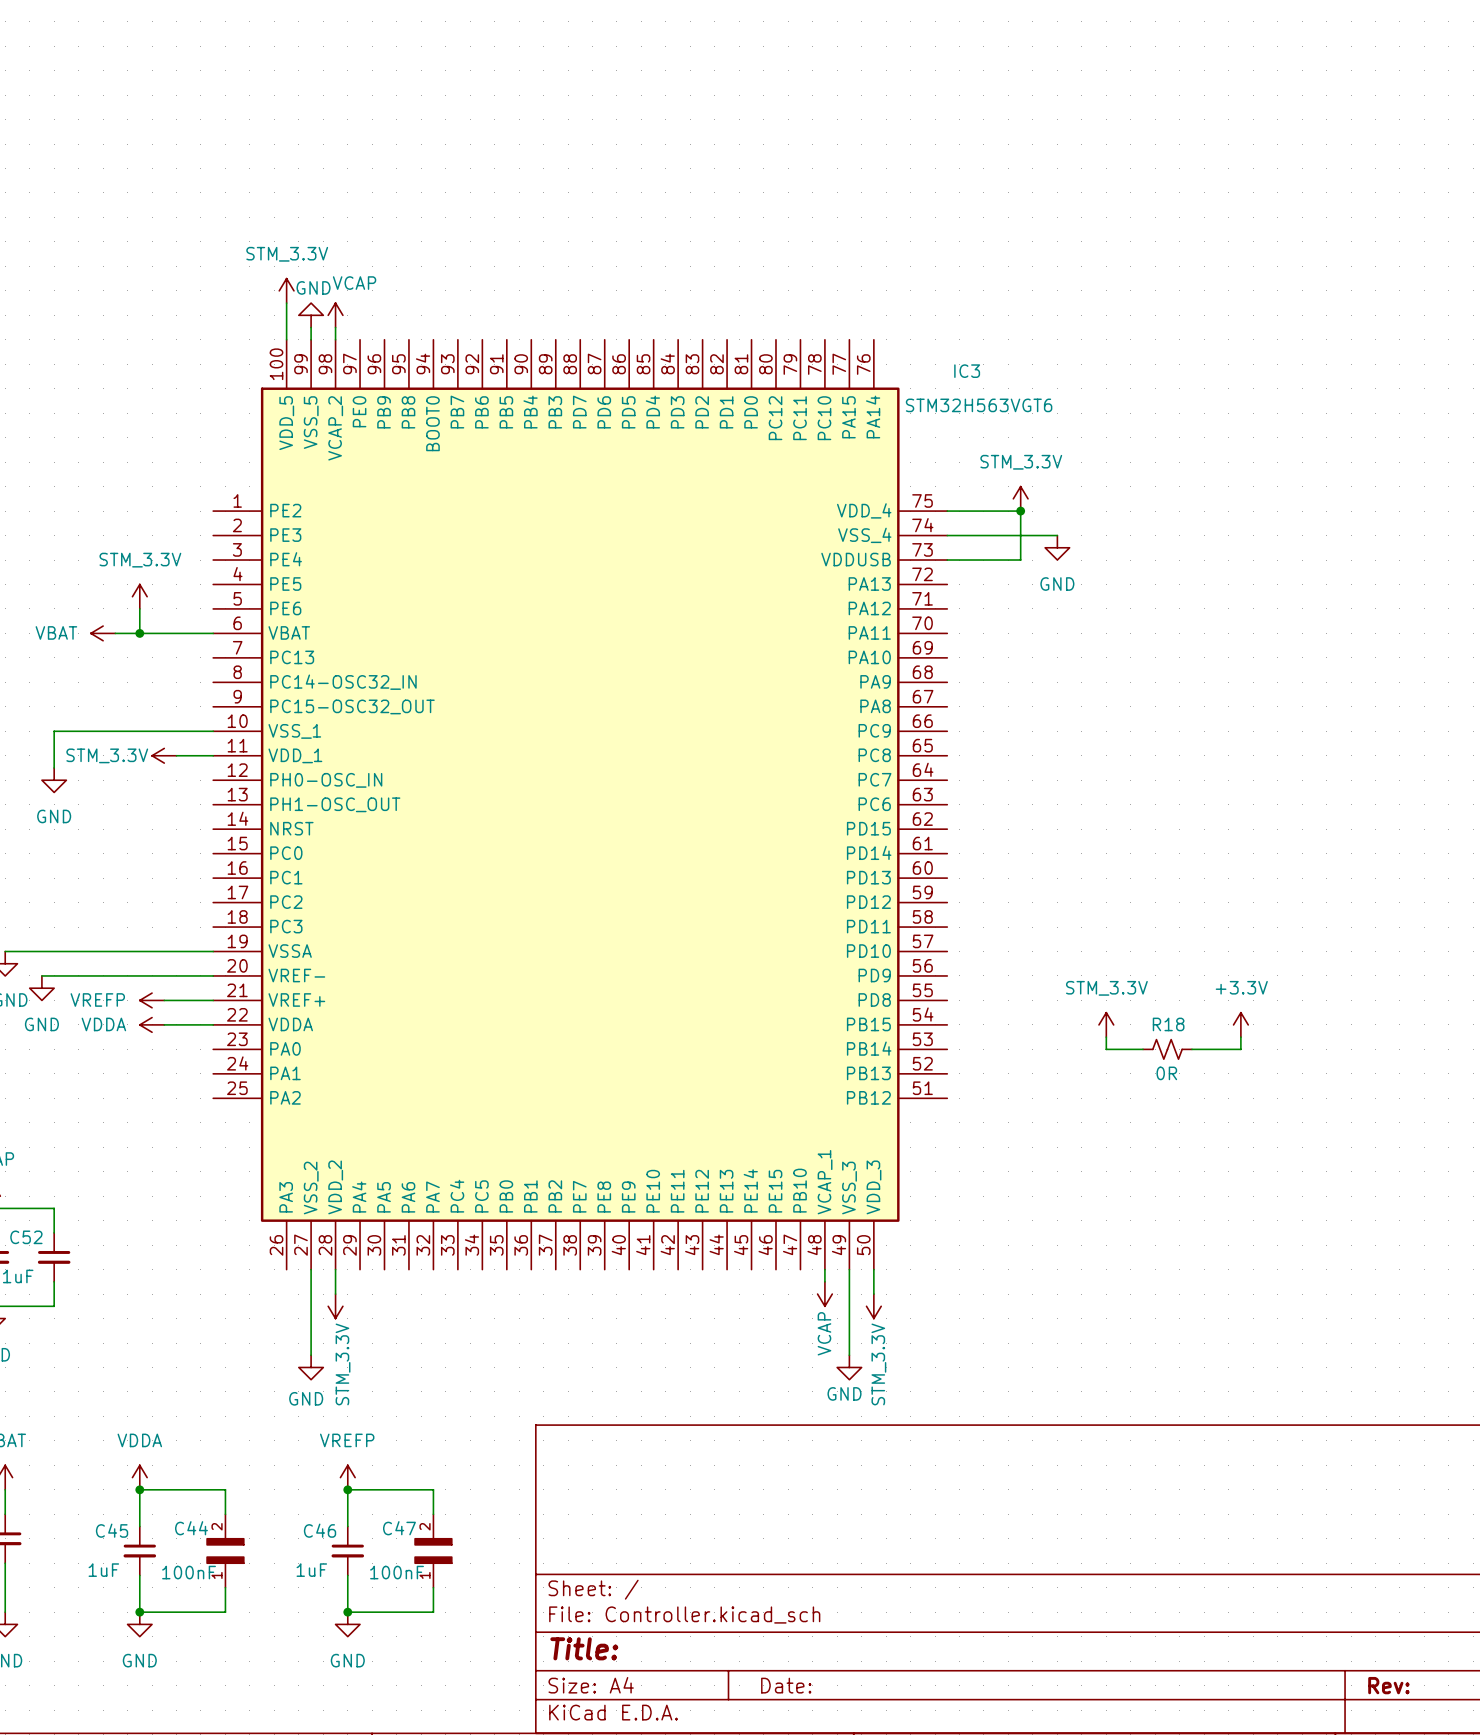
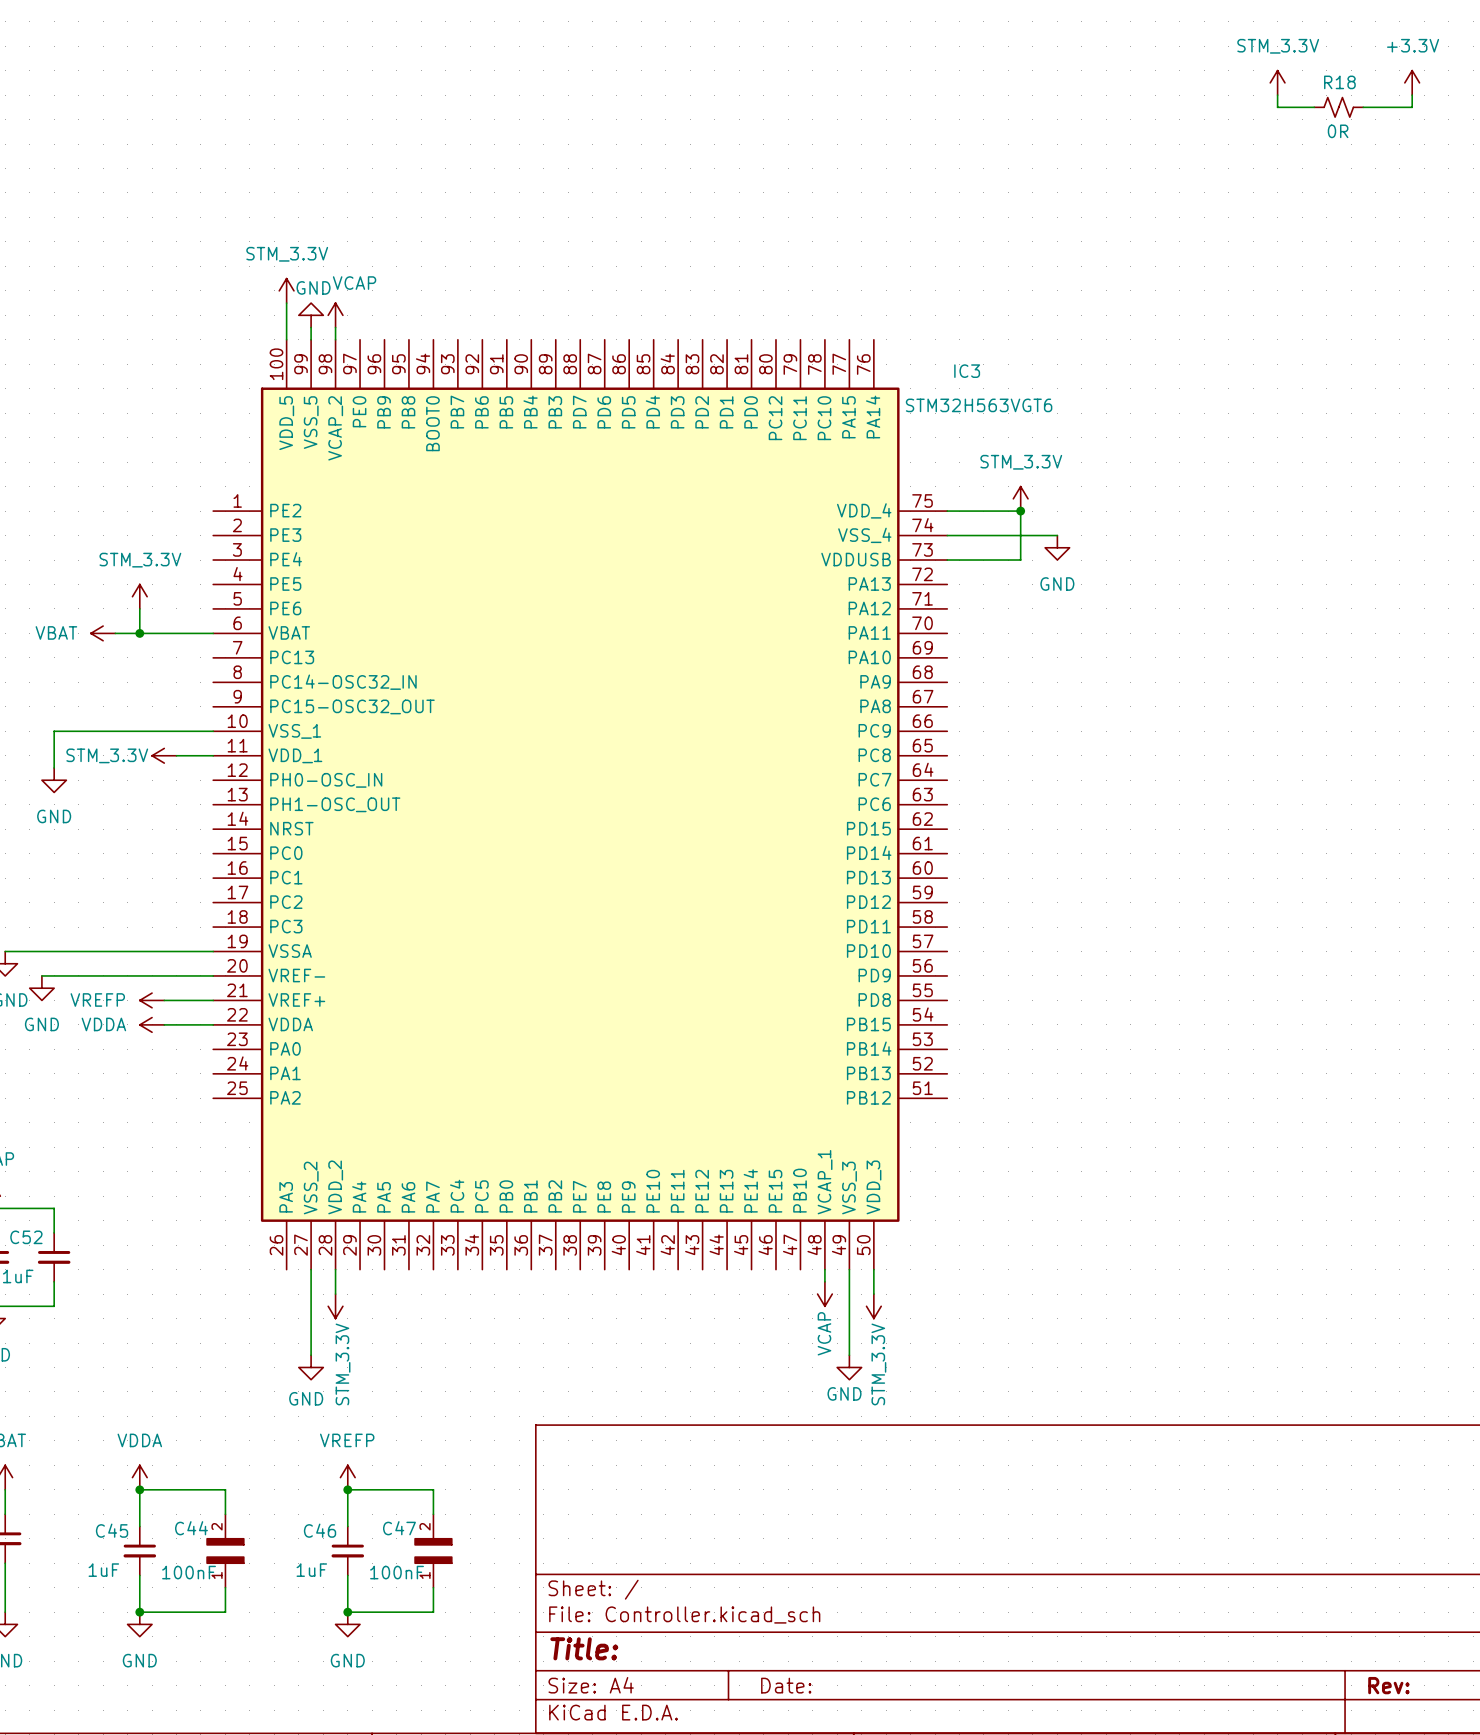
power symbol: none -> STM_3.3V (1277, 82)
power symbol: none -> +3.3V (1412, 82)
wire: none -> (1277, 95) (1277, 107) (1314, 107)
wire: none -> (1412, 95) (1412, 107) (1363, 107)
power symbol: STM_3.3V (1106, 1024) -> none
power symbol: +3.3V (1240, 1024) -> none
wire: (1106, 1037) (1106, 1049) (1143, 1049) -> none
wire: (1240, 1037) (1240, 1049) (1191, 1049) -> none
R18 position: (1167, 1049) -> (1338, 107)

